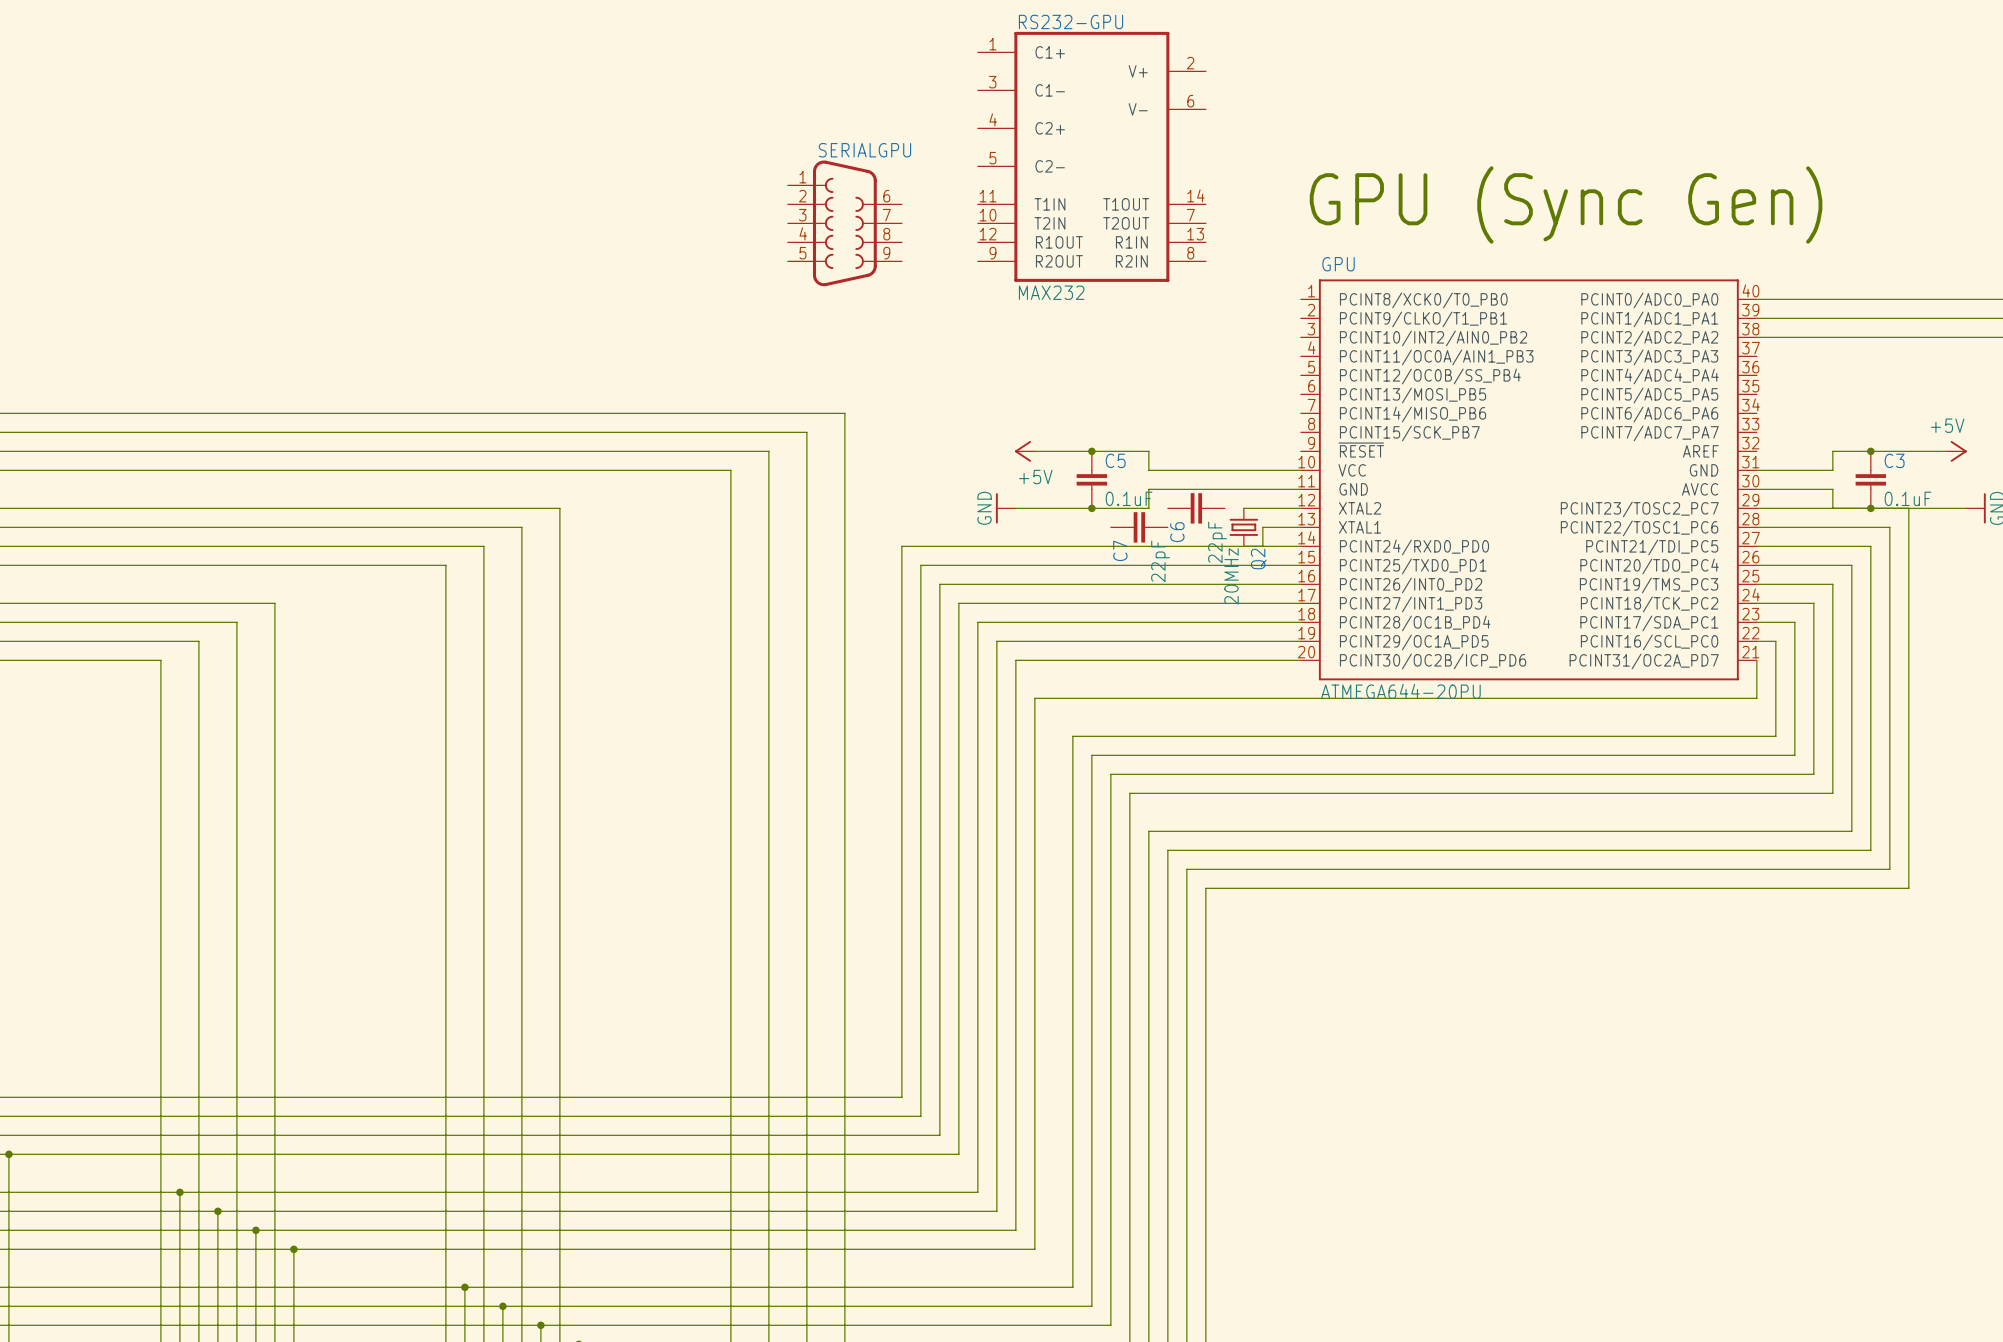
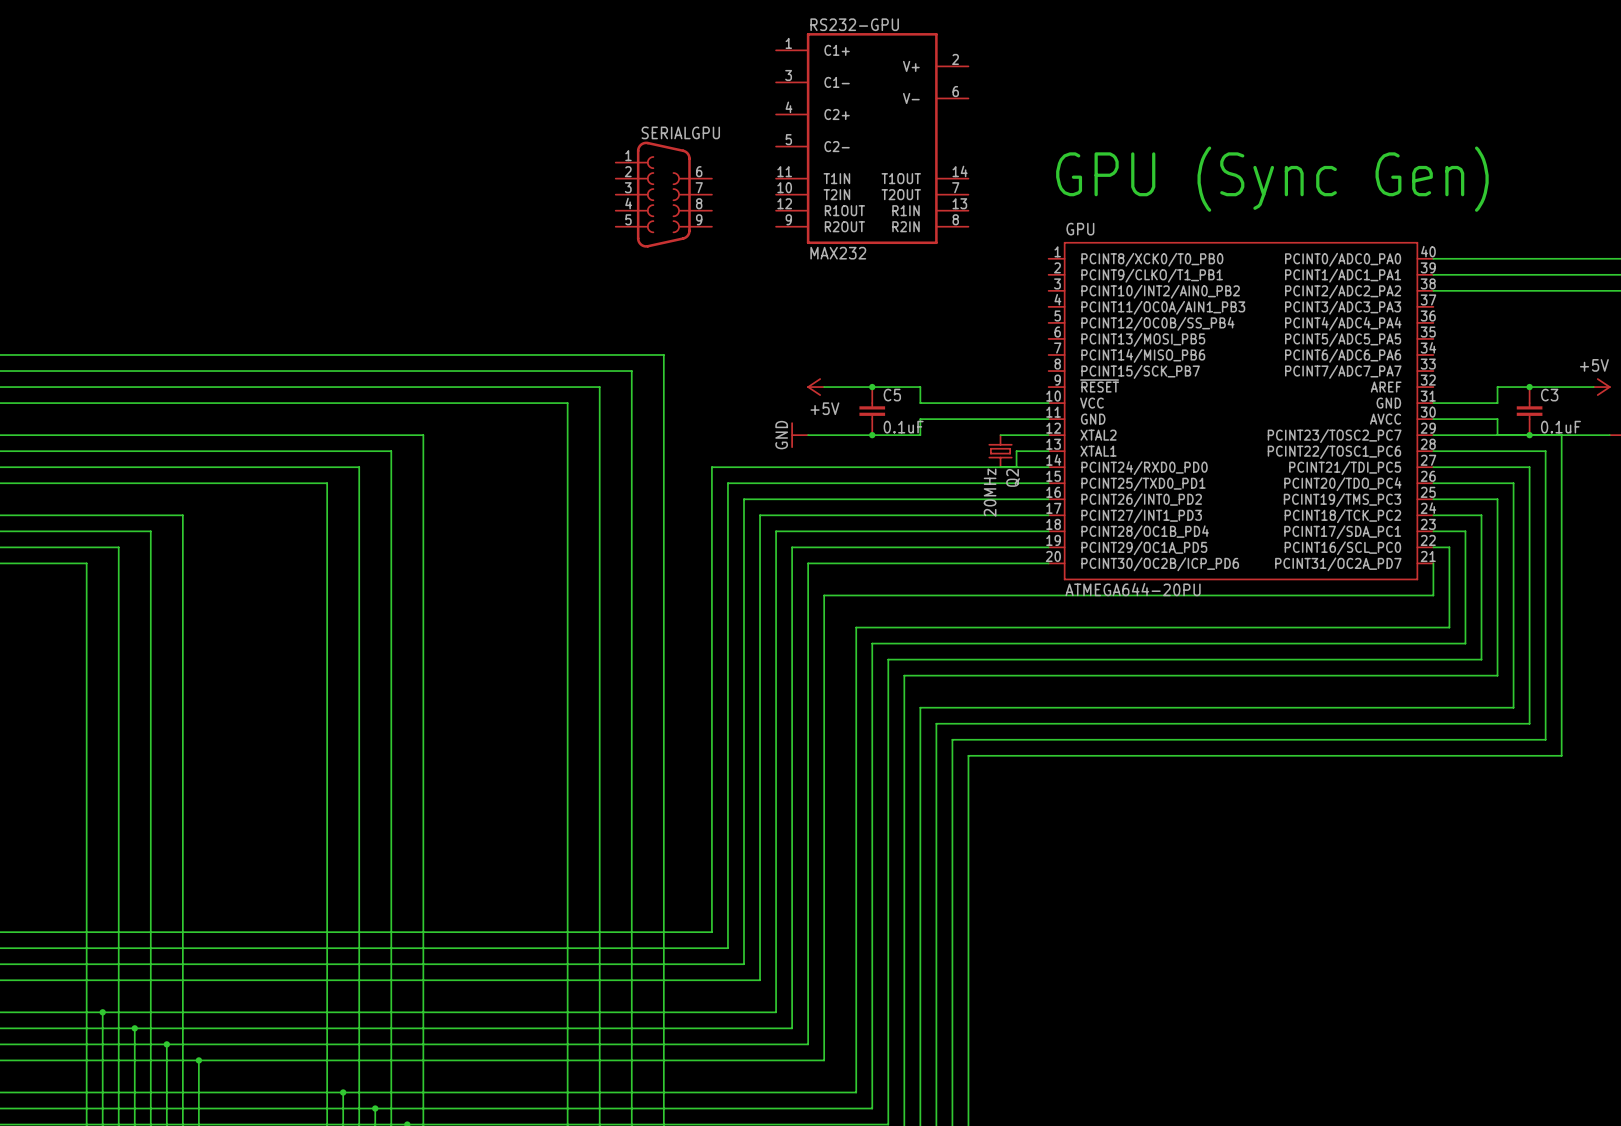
C6: 22pF (1196, 508) -> none
C7: 22pF (1139, 527) -> none

